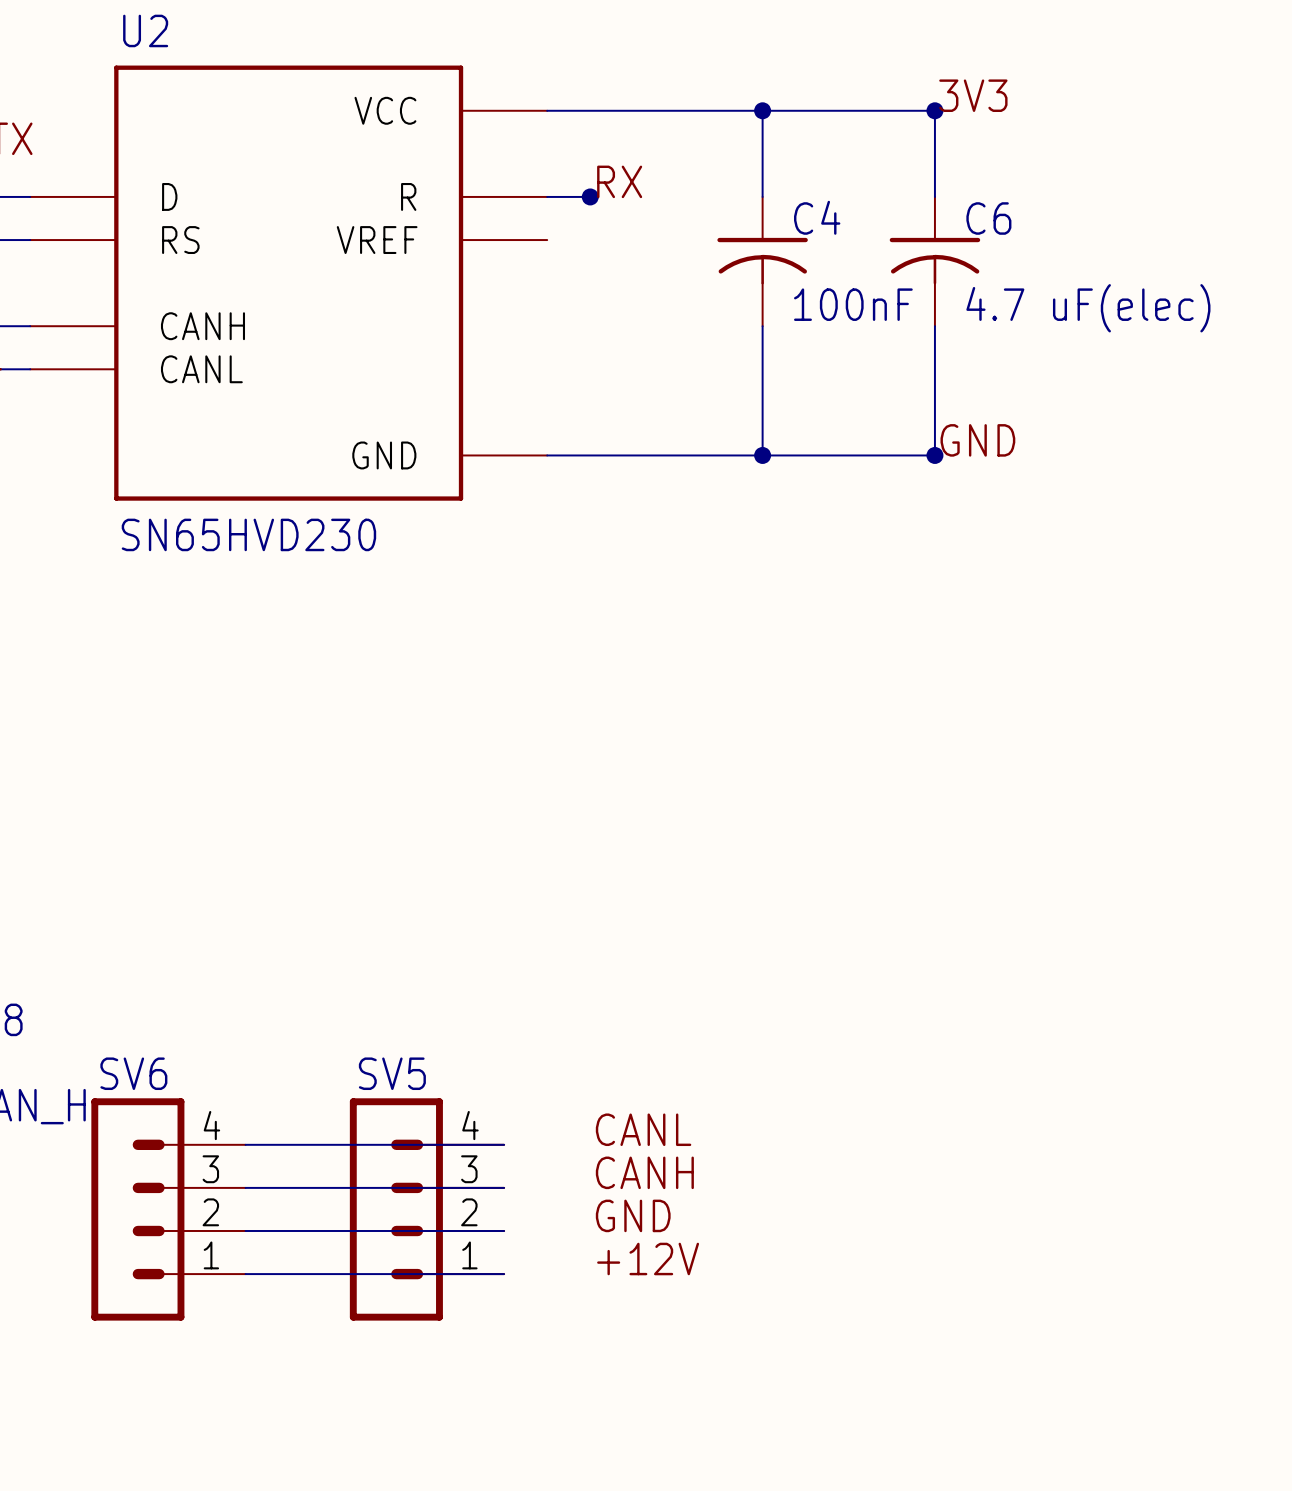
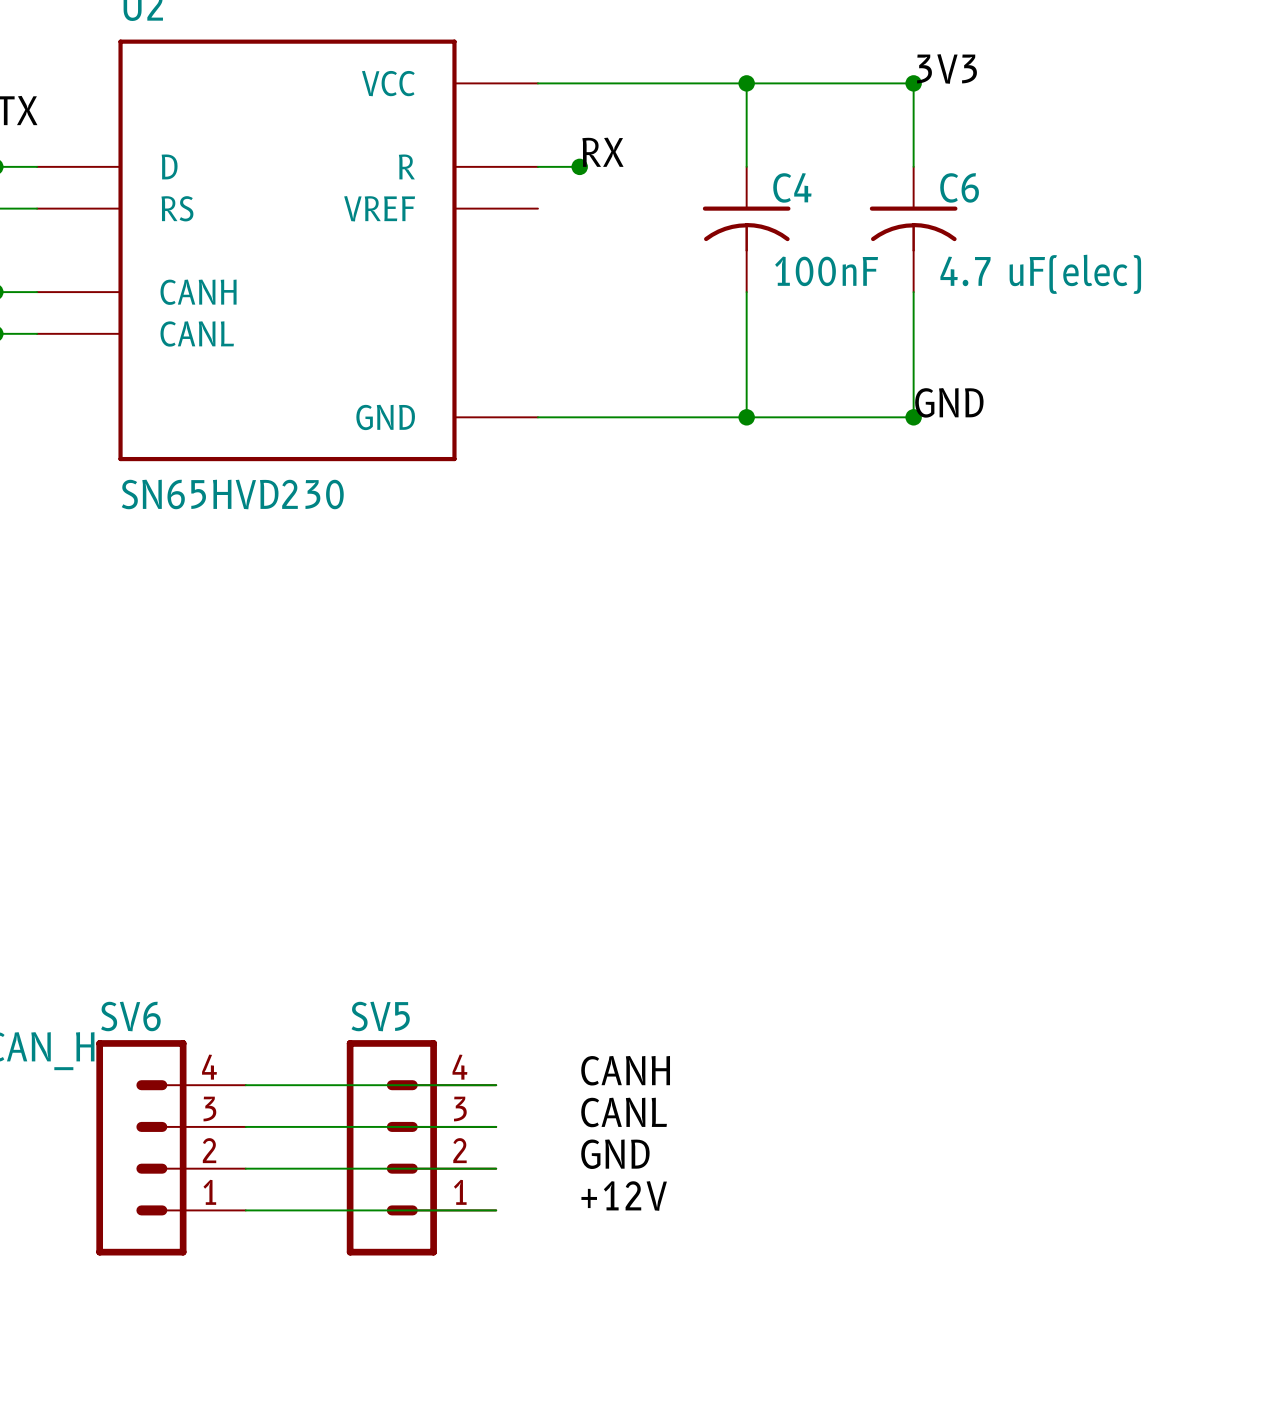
label: CANL (643, 1129) -> CANH (625, 1070)
label: CANH (644, 1172) -> CANL (624, 1112)

